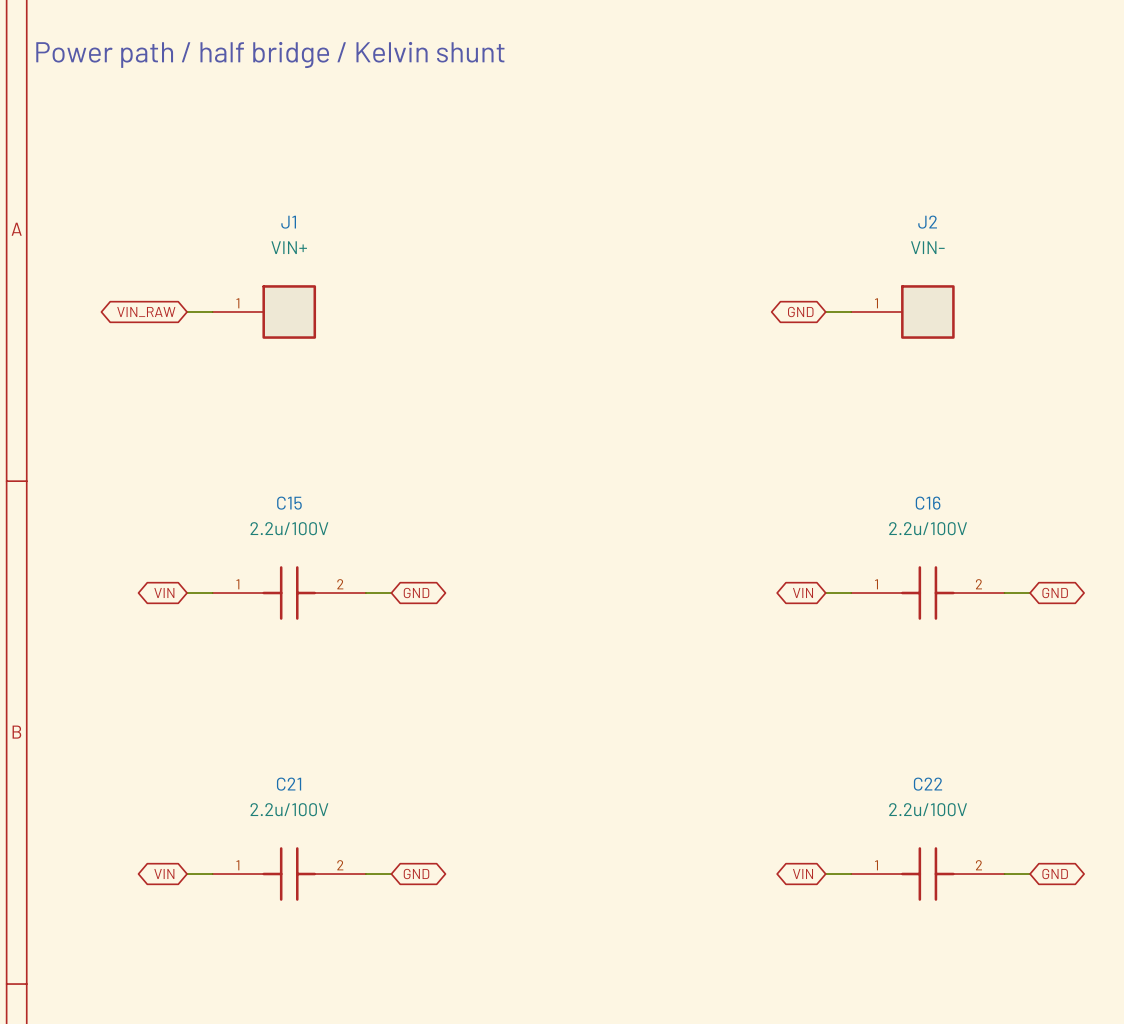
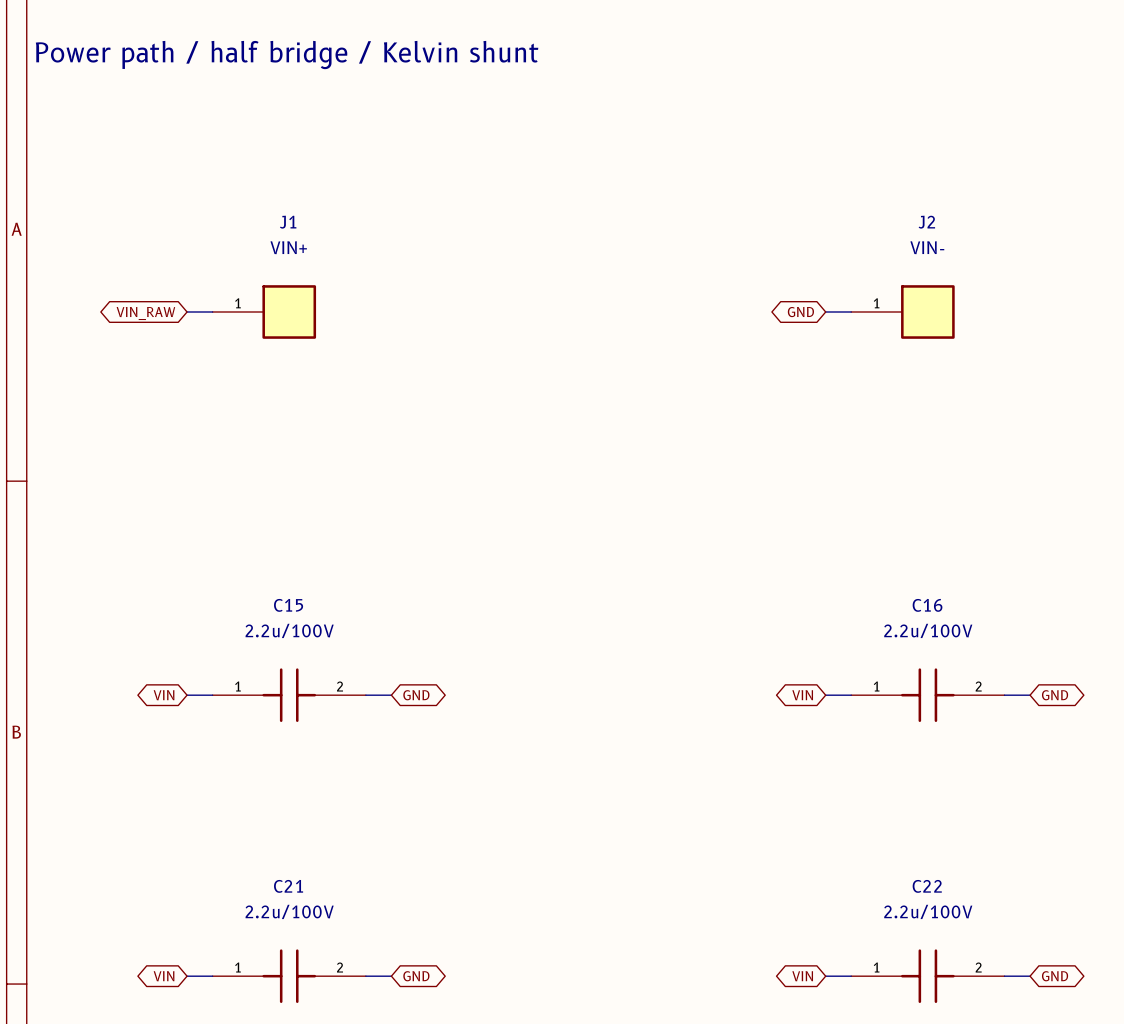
global label: VIN (164, 593) -> none
wire: (187, 593) (212, 593) -> (187, 695) (212, 695)
C15 position: (289, 593) -> (289, 695)
wire: (365, 593) (391, 593) -> (365, 695) (391, 695)
global label: GND (416, 593) -> none
global label: VIN (803, 593) -> none
wire: (825, 593) (851, 593) -> (825, 695) (851, 695)
C16 position: (927, 593) -> (927, 695)
wire: (1004, 593) (1030, 593) -> (1004, 695) (1030, 695)
global label: GND (1055, 593) -> none
global label: none -> VIN (164, 695)
global label: none -> GND (416, 695)
global label: none -> VIN (802, 695)
global label: none -> GND (1055, 695)
global label: VIN (164, 874) -> none
wire: (187, 874) (212, 874) -> (187, 976) (212, 976)
C21 position: (289, 874) -> (289, 976)
wire: (365, 874) (391, 874) -> (365, 976) (391, 976)
global label: GND (416, 874) -> none
global label: VIN (803, 874) -> none
wire: (825, 874) (851, 874) -> (825, 976) (851, 976)
C22 position: (927, 874) -> (927, 976)
wire: (1004, 874) (1030, 874) -> (1004, 976) (1030, 976)
global label: GND (1055, 874) -> none
global label: none -> VIN (164, 976)
global label: none -> GND (416, 976)
global label: none -> VIN (802, 976)
global label: none -> GND (1055, 976)

